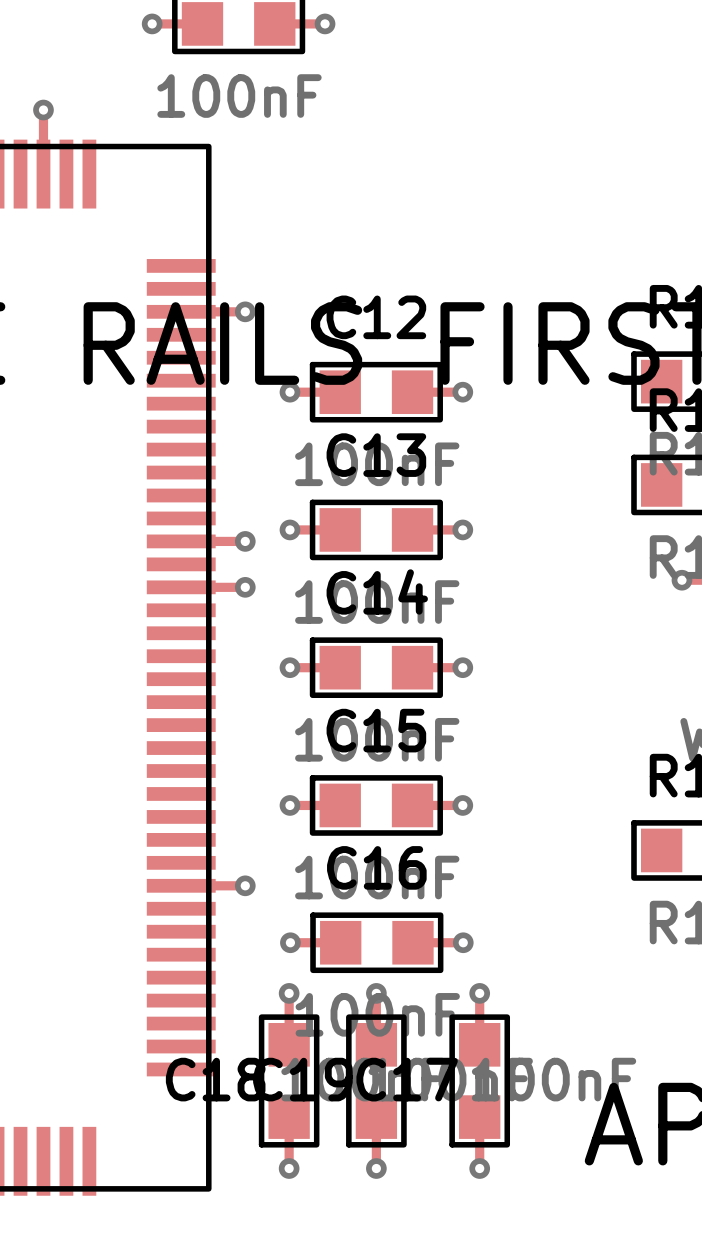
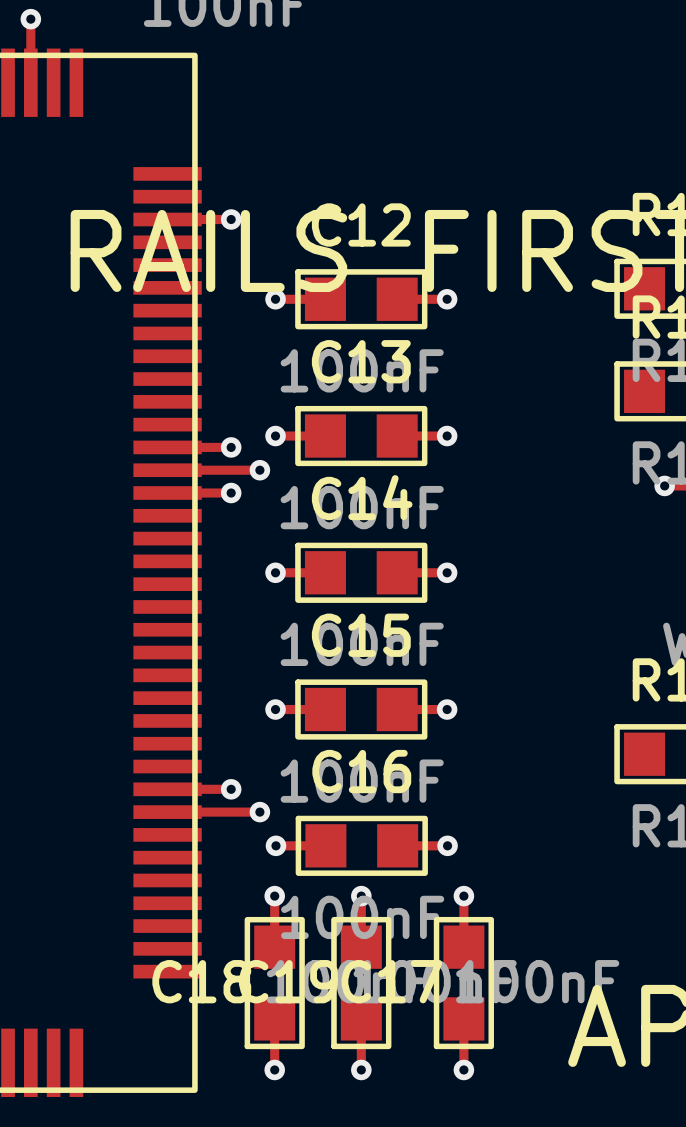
track: none -> (167, 470) (259, 470)
via: none -> (259, 470)
track: none -> (167, 812) (259, 812)
via: none -> (259, 812)

